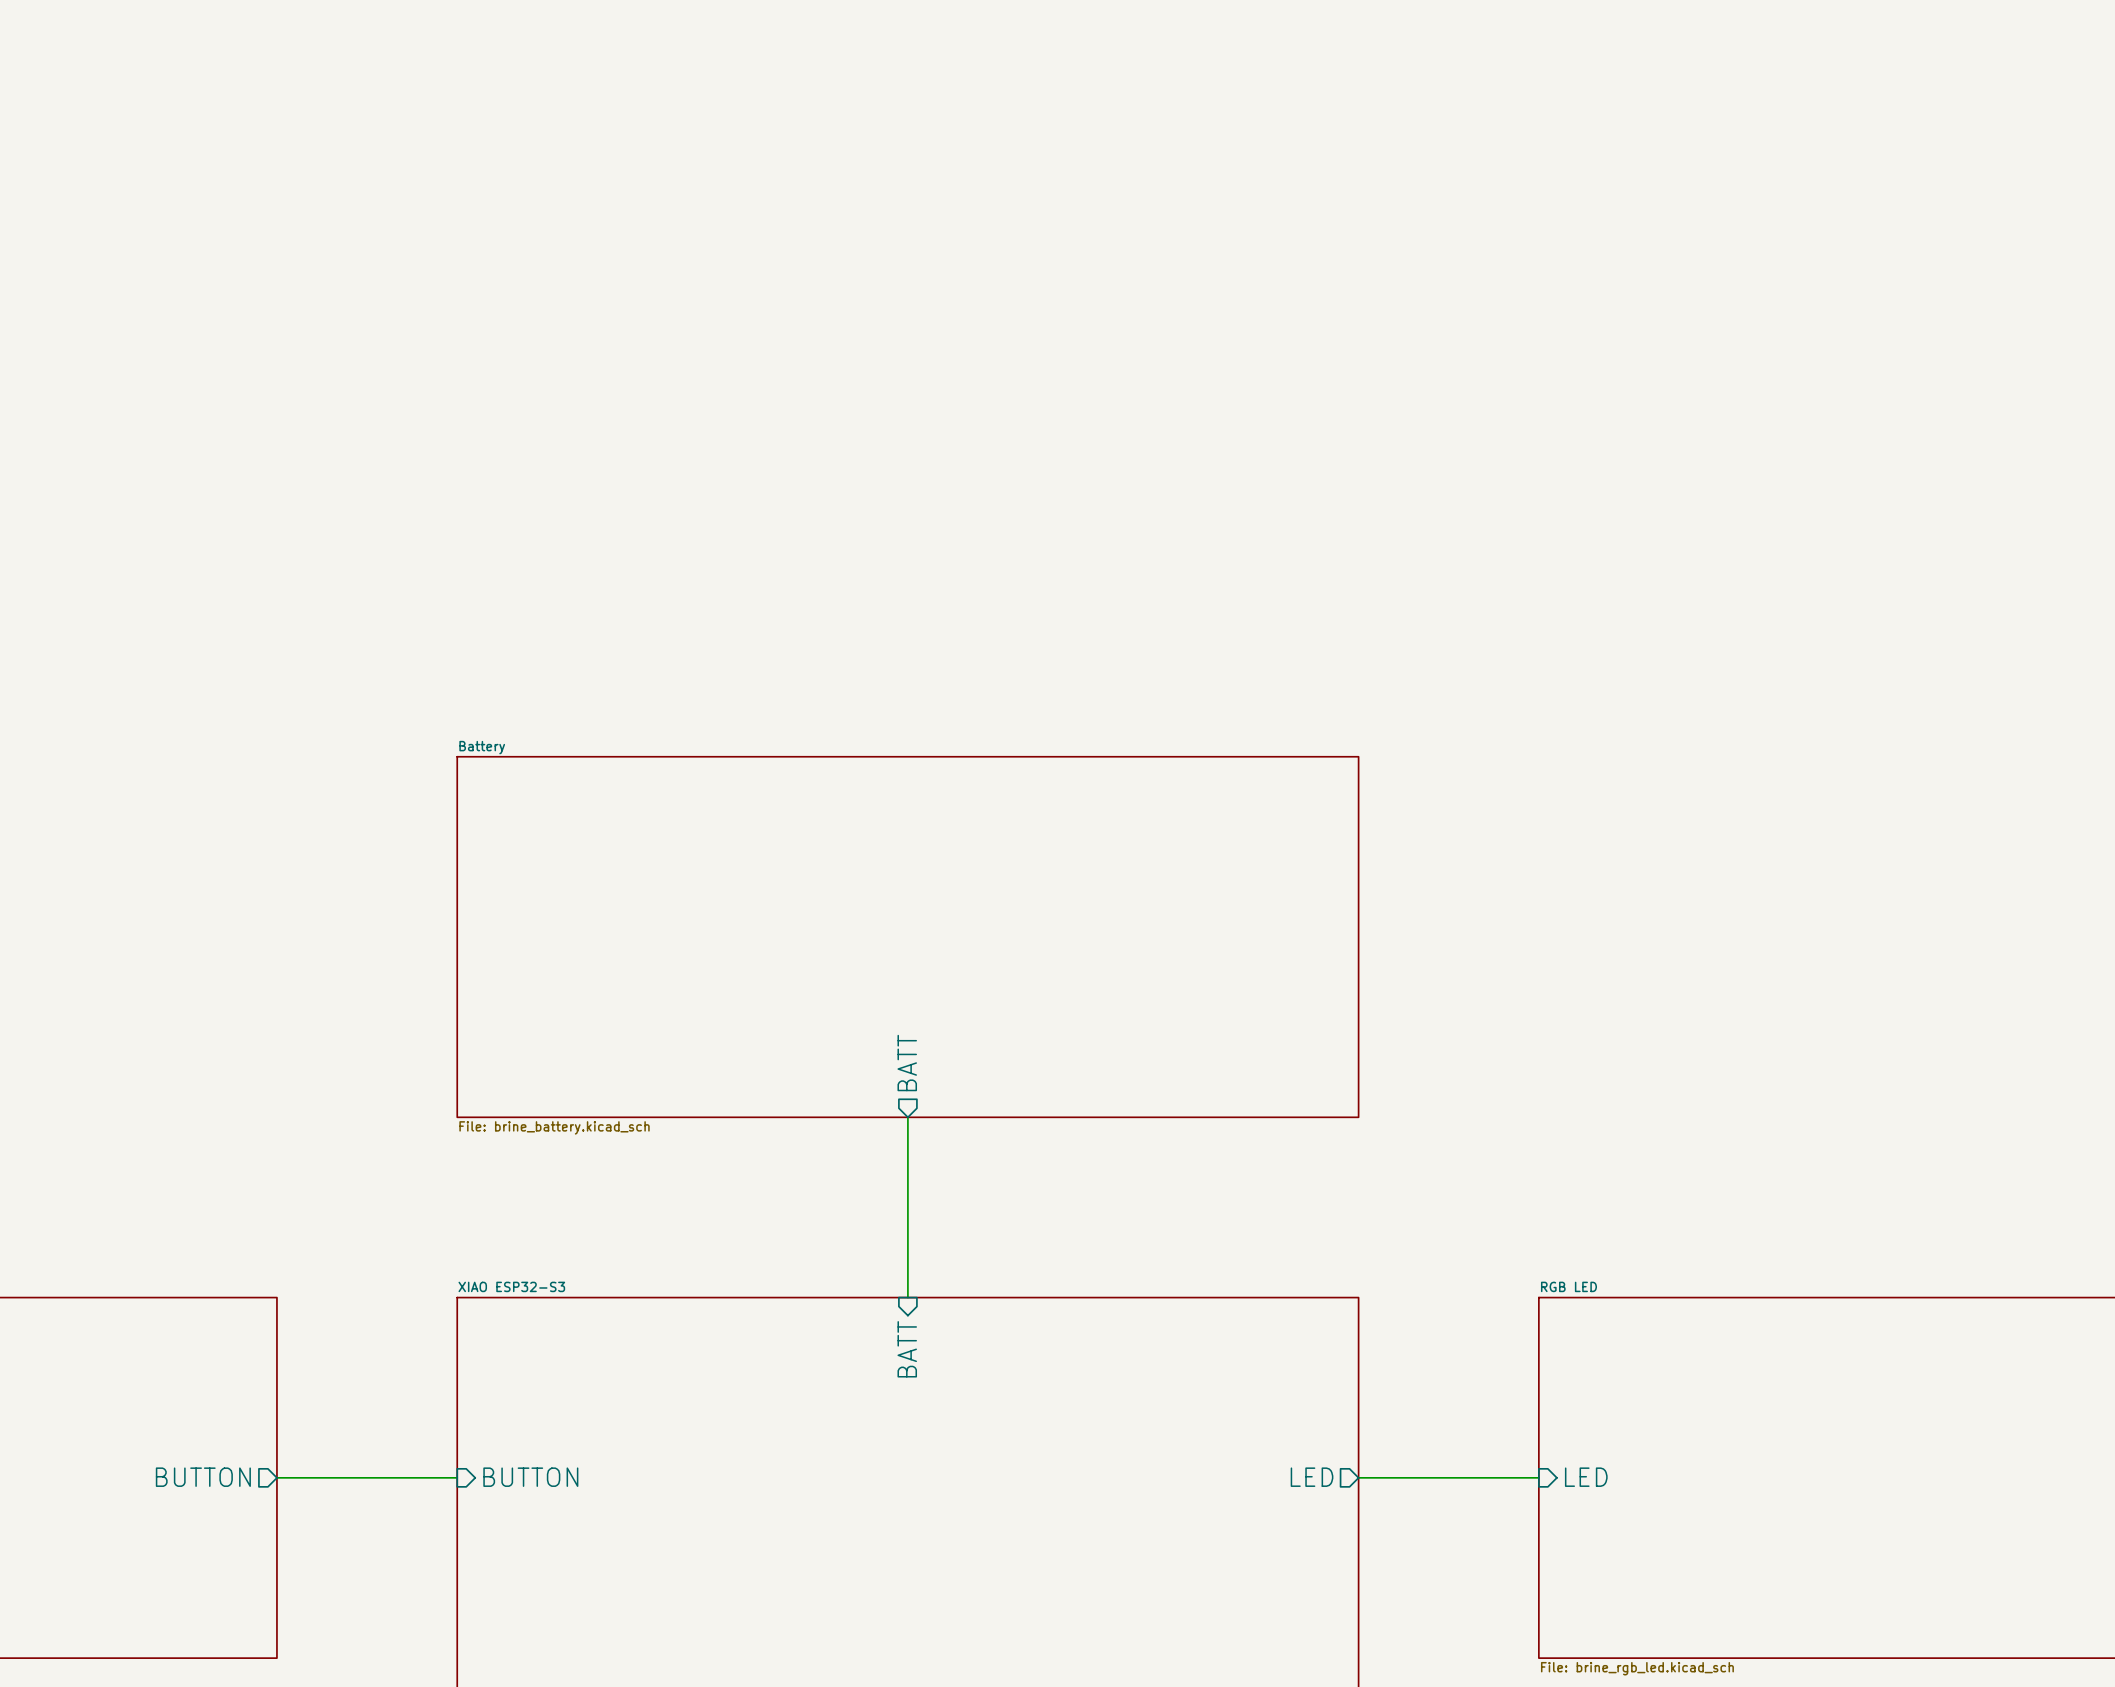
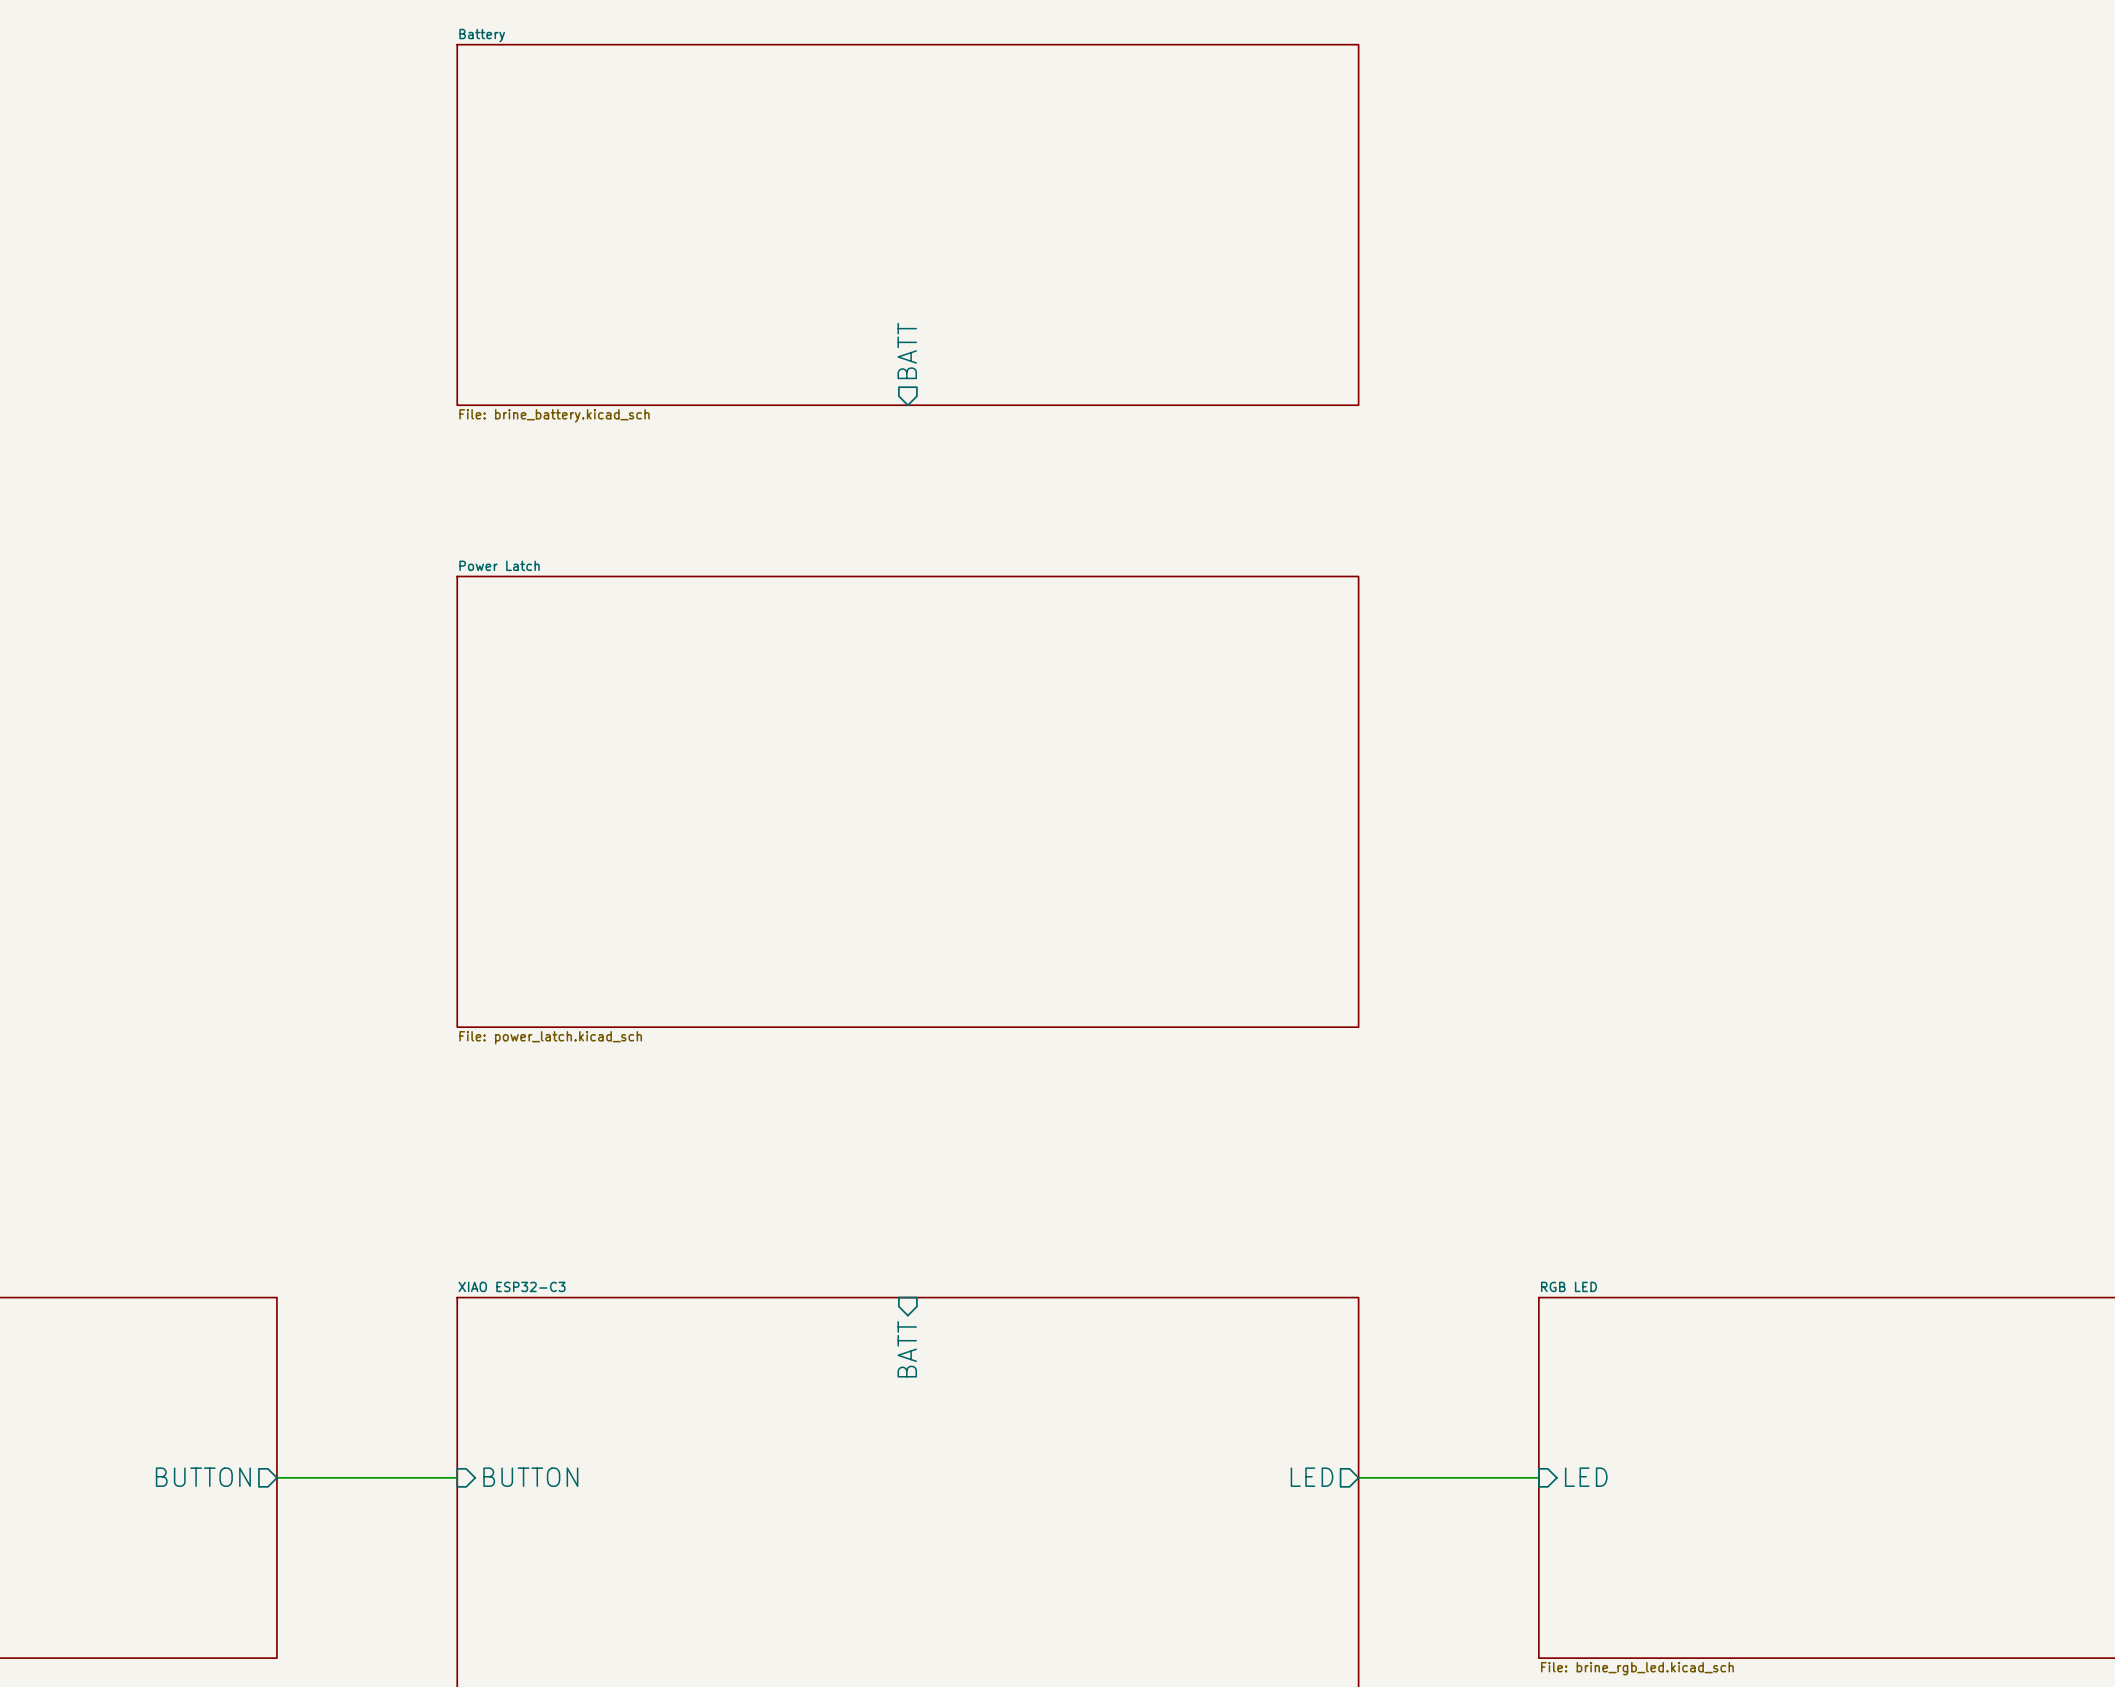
sheet Battery: none -> File: brine_battery.kicad_sch (907, 224)
sheet pin: none -> BATT (907, 350)
sheet Power Latch: none -> File: power_latch.kicad_sch (907, 801)
sheet Battery: File: brine_battery.kicad_sch (907, 937) -> none
sheet pin: BATT (907, 1063) -> none
wire: (907, 1117) (907, 1297) -> none
sheet XIAO ESP32-S3 name: XIAO ESP32-S3 (511, 1286) -> XIAO ESP32-C3 (512, 1286)

